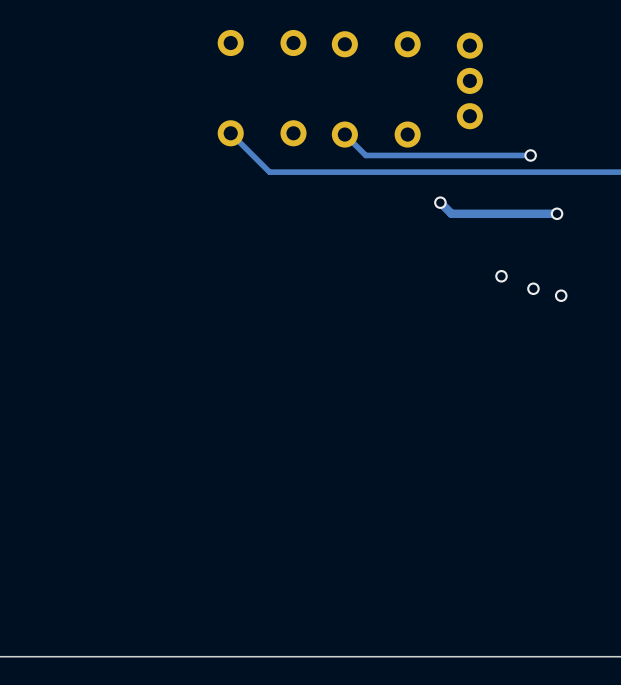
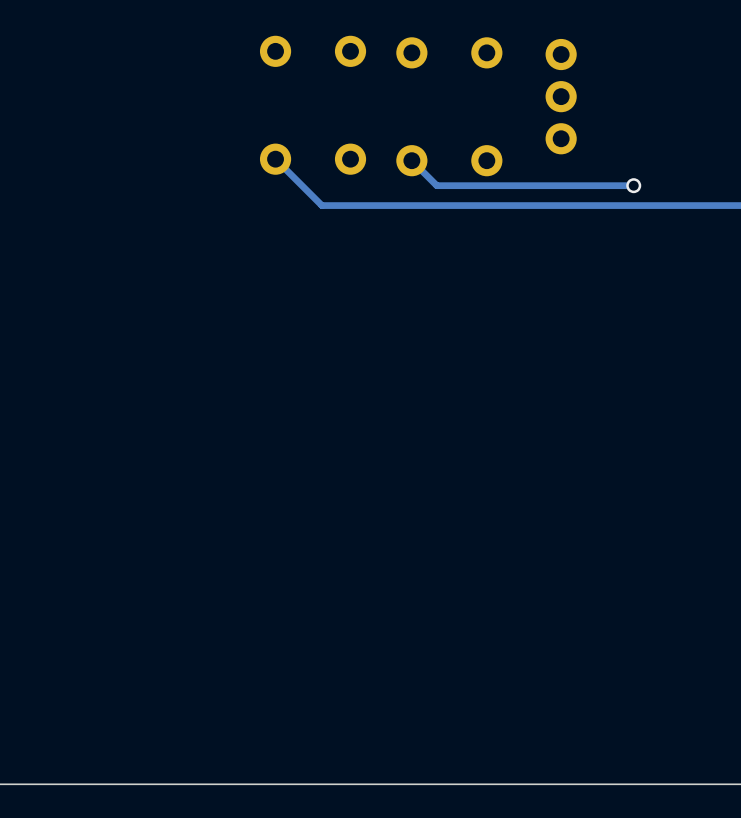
track: (440, 202) (451, 213) (557, 213) -> none
via: (440, 202) -> none
via: (557, 213) -> none
via: (501, 276) -> none
via: (533, 288) -> none
via: (561, 295) -> none

